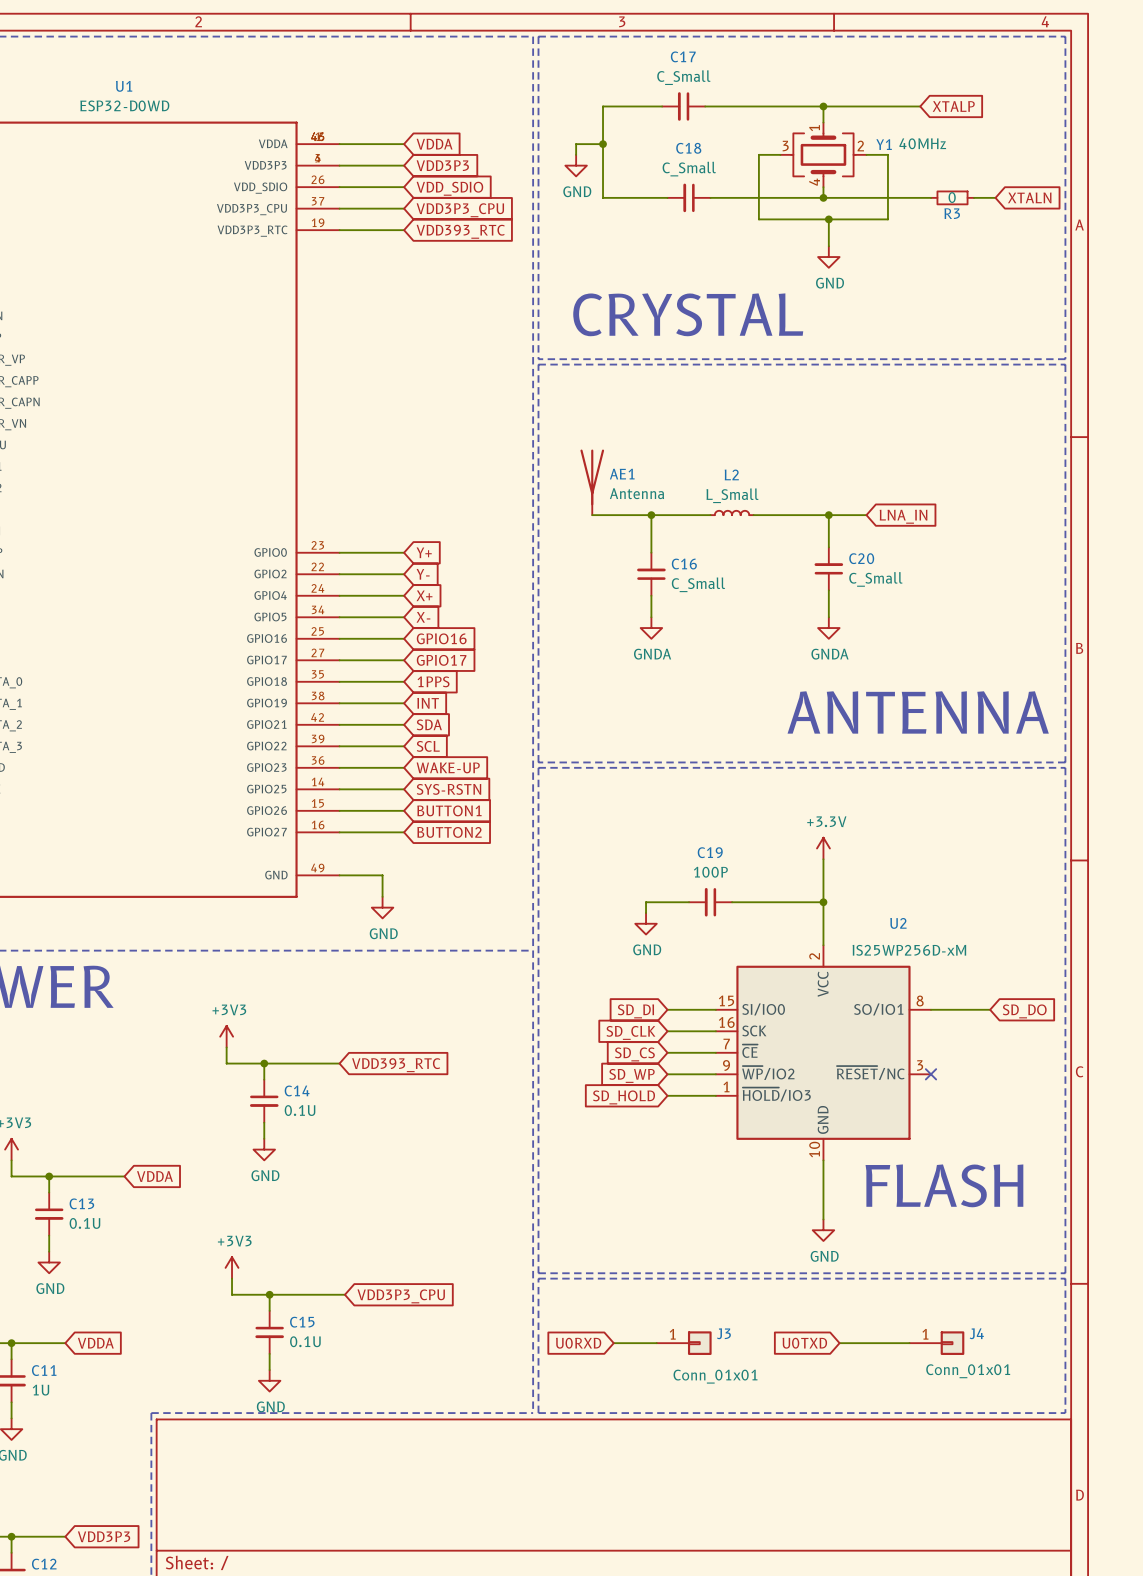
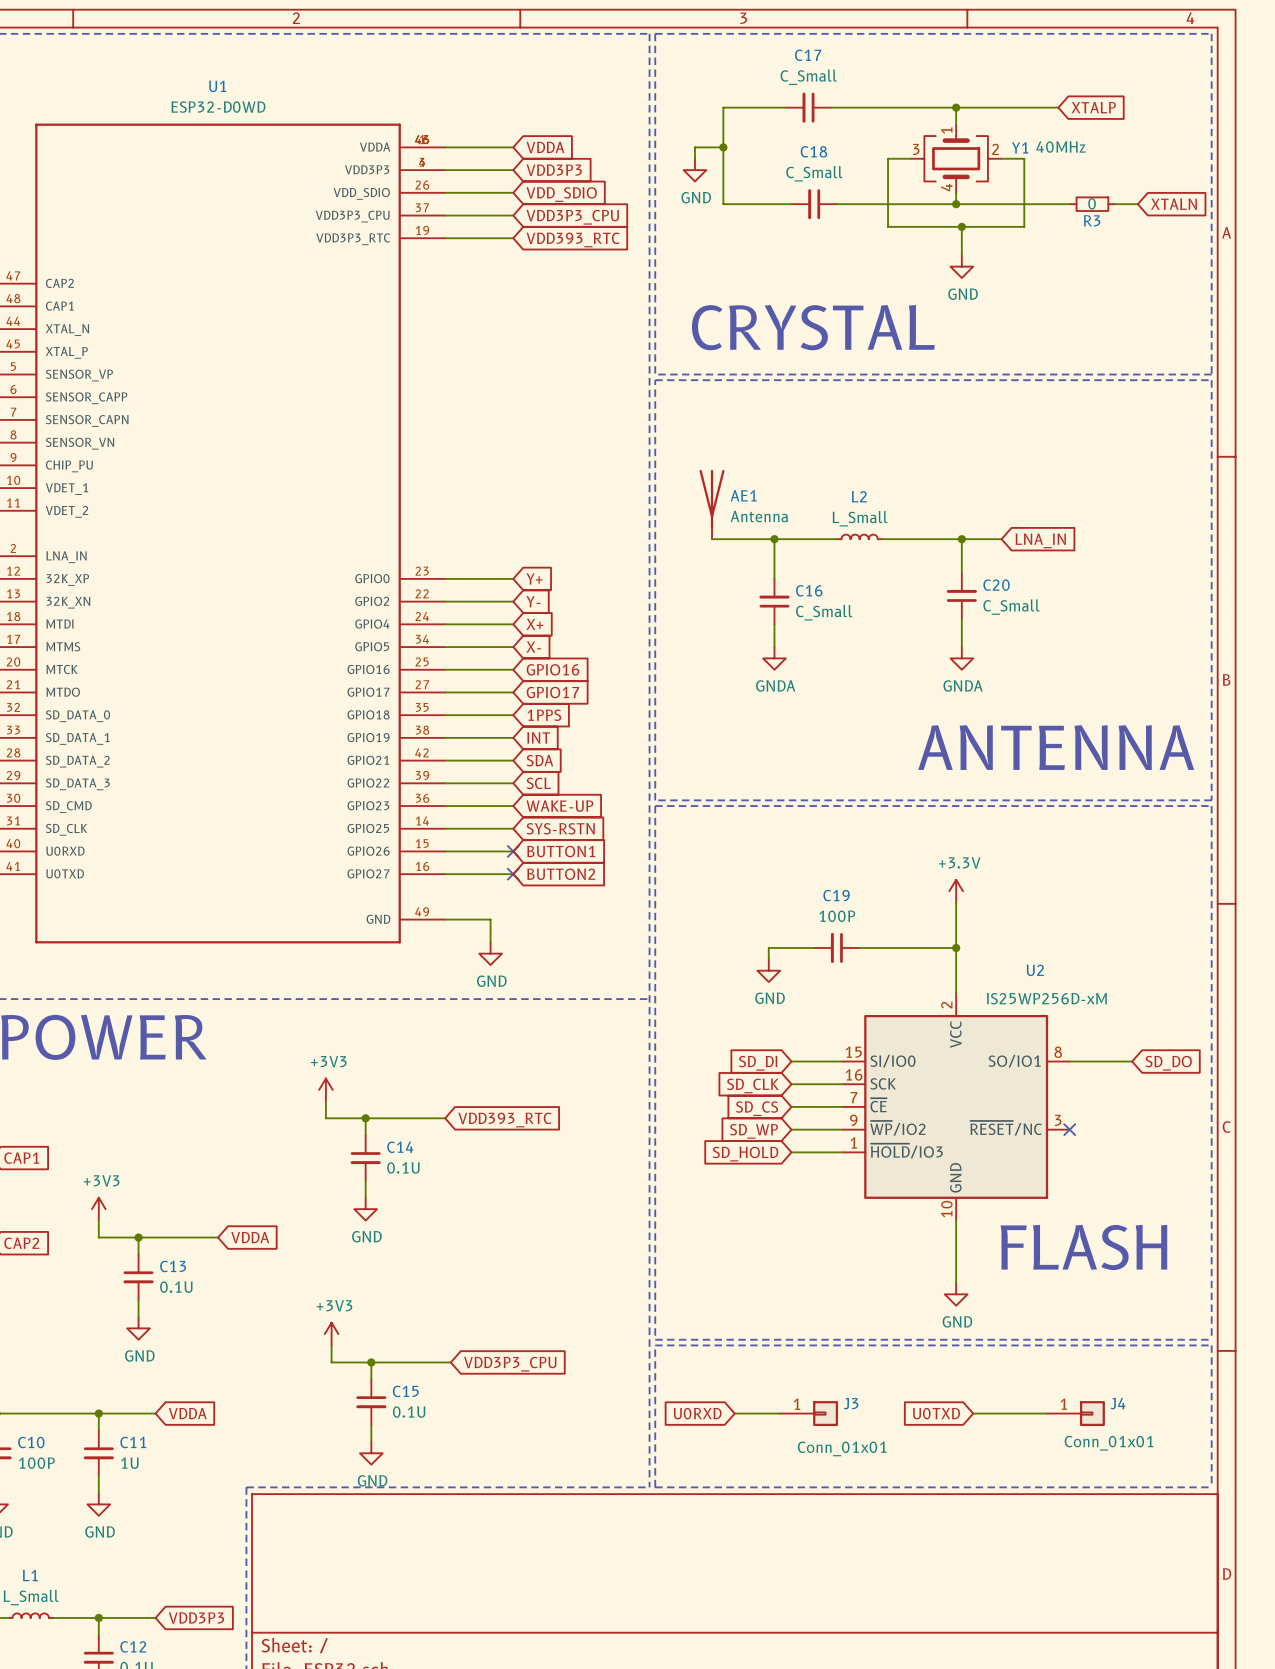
no-connect mark: none -> (513, 851)
no-connect mark: none -> (513, 874)

